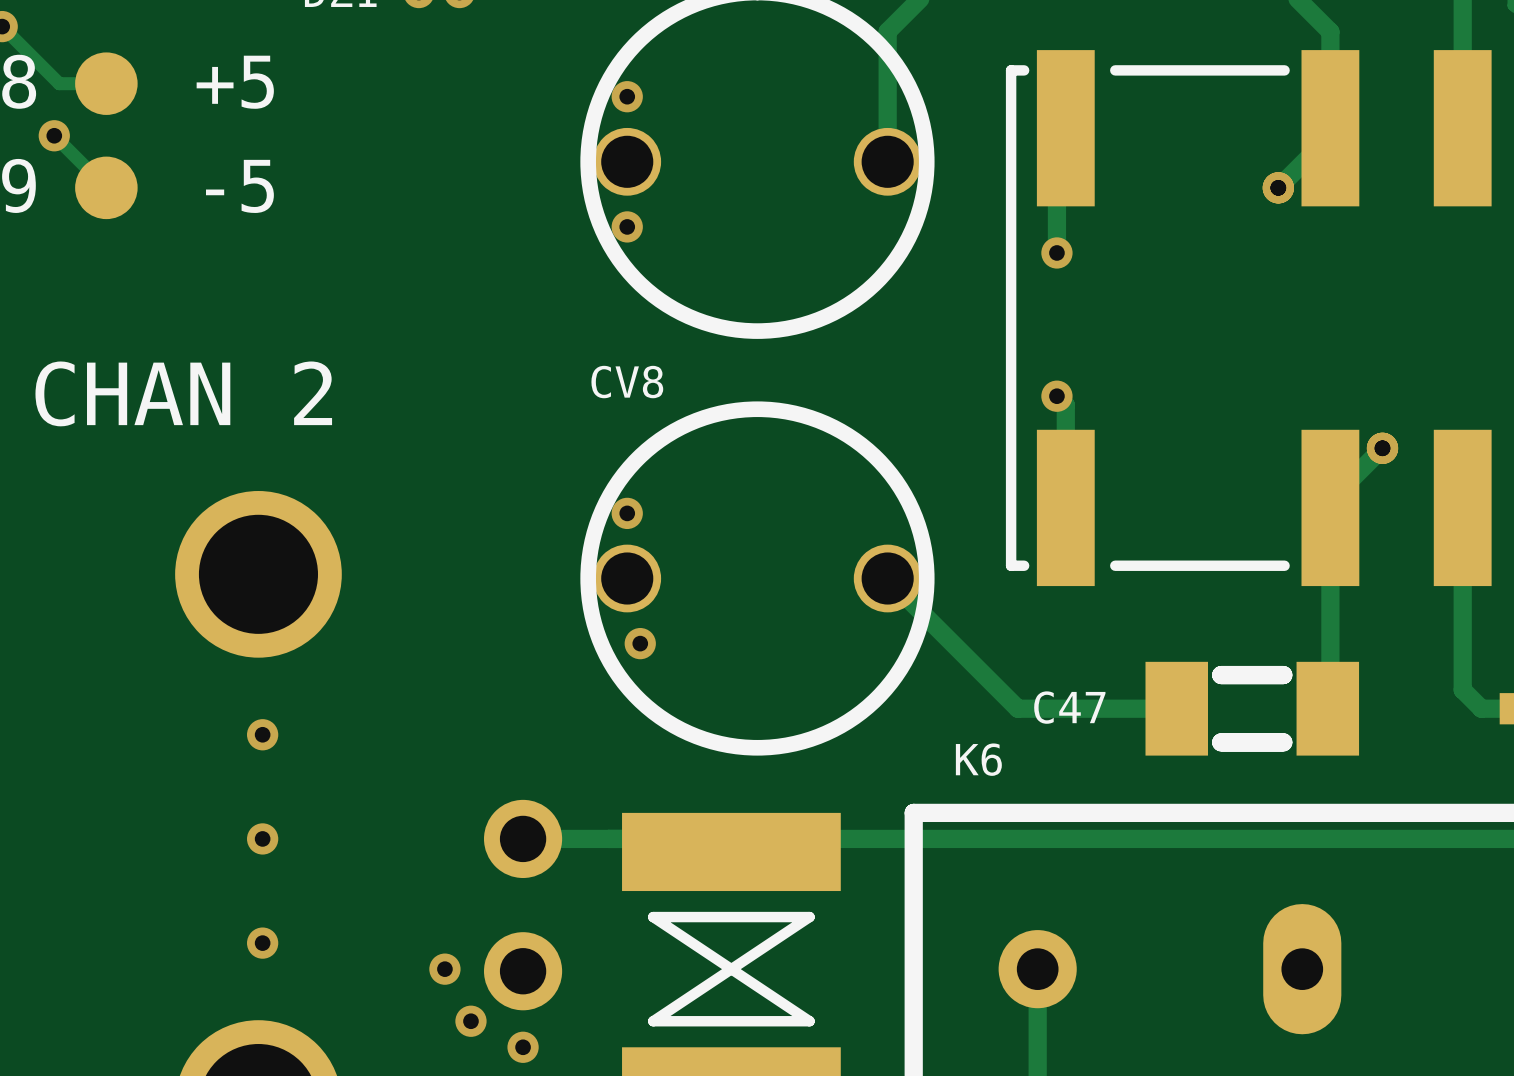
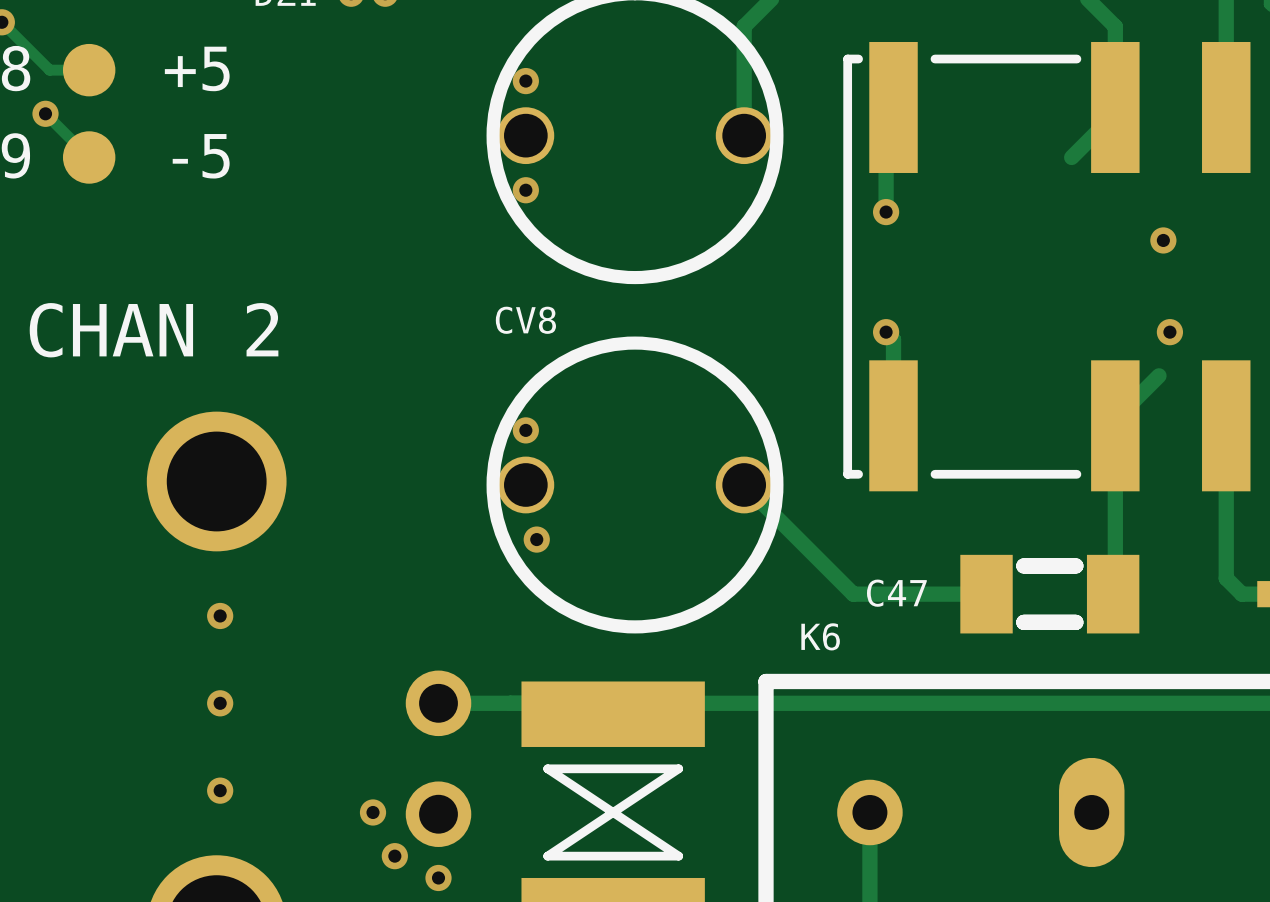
via: (1278, 187) -> none
via: none -> (1163, 240)
via position: (1382, 448) -> (1169, 332)

